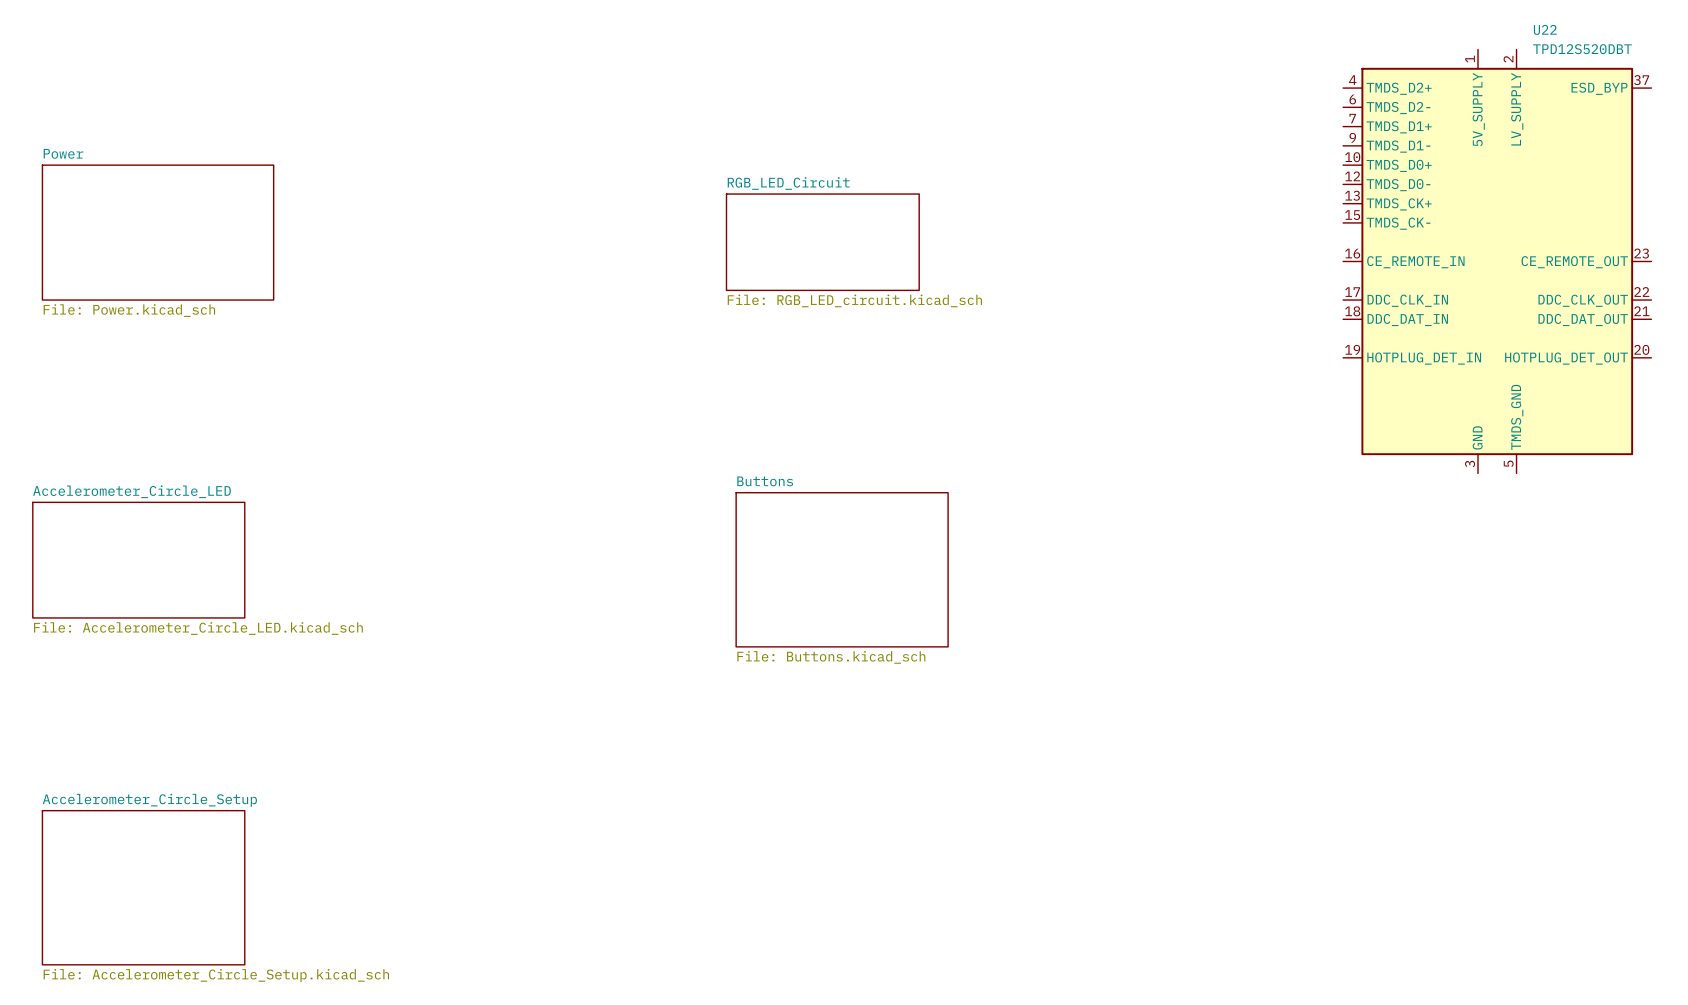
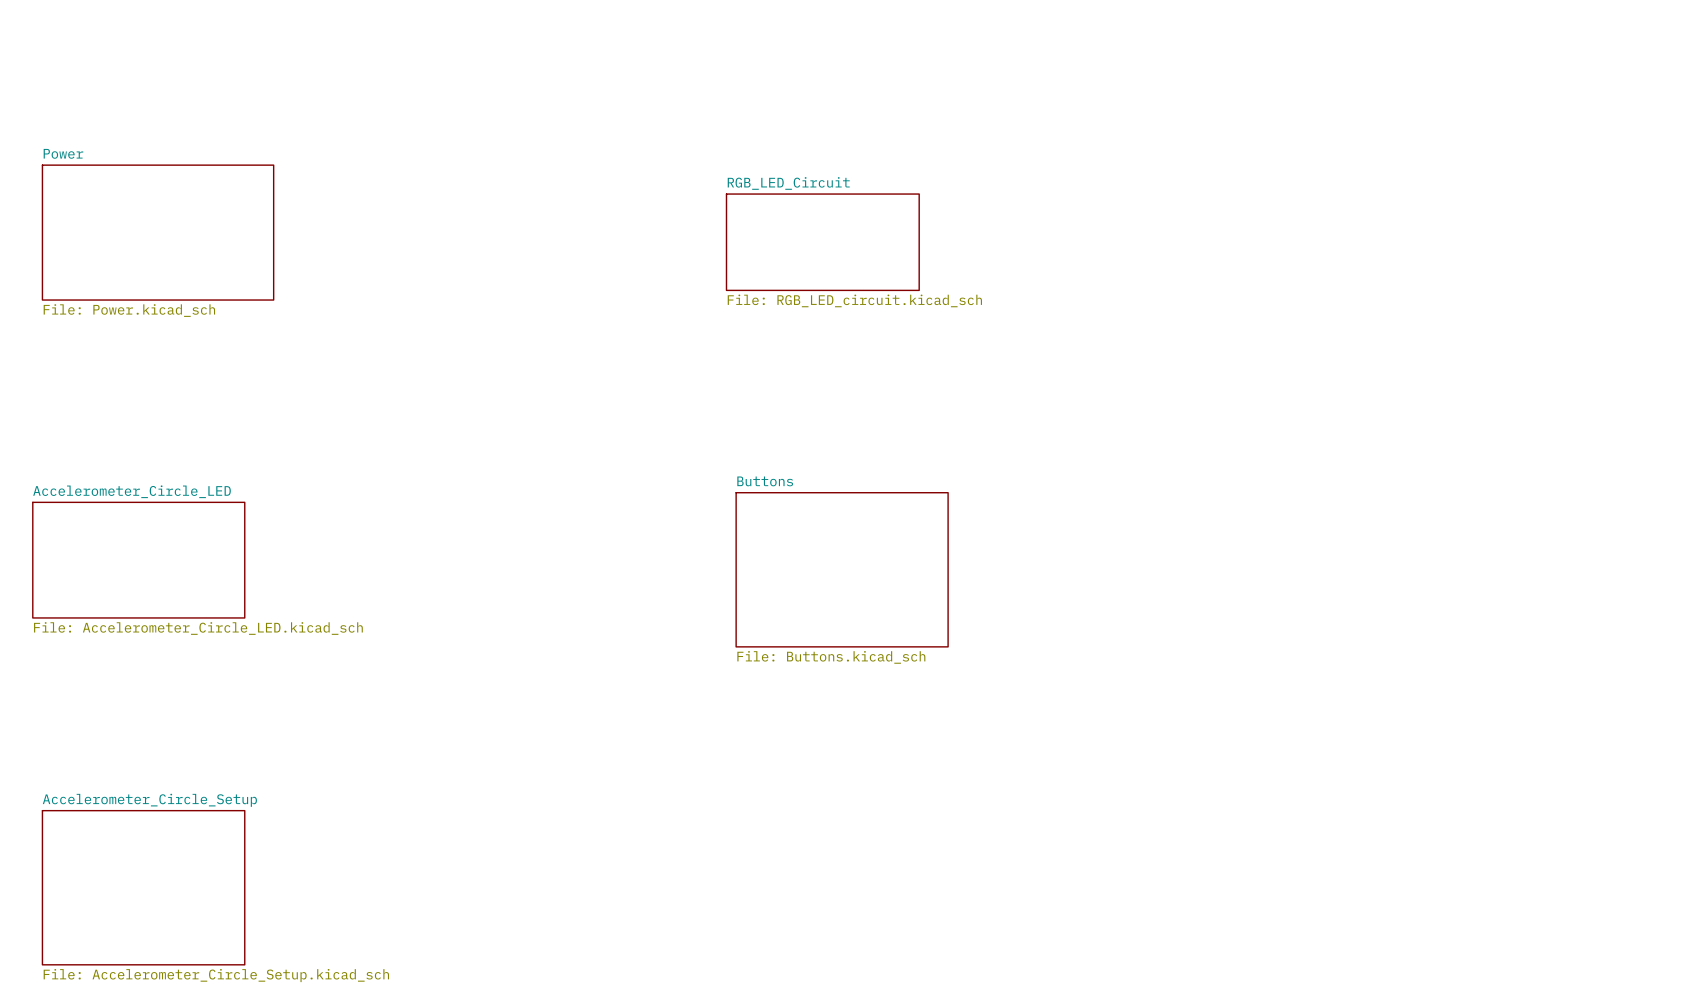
U22: TPD12S520DBT (1497, 261) -> none

